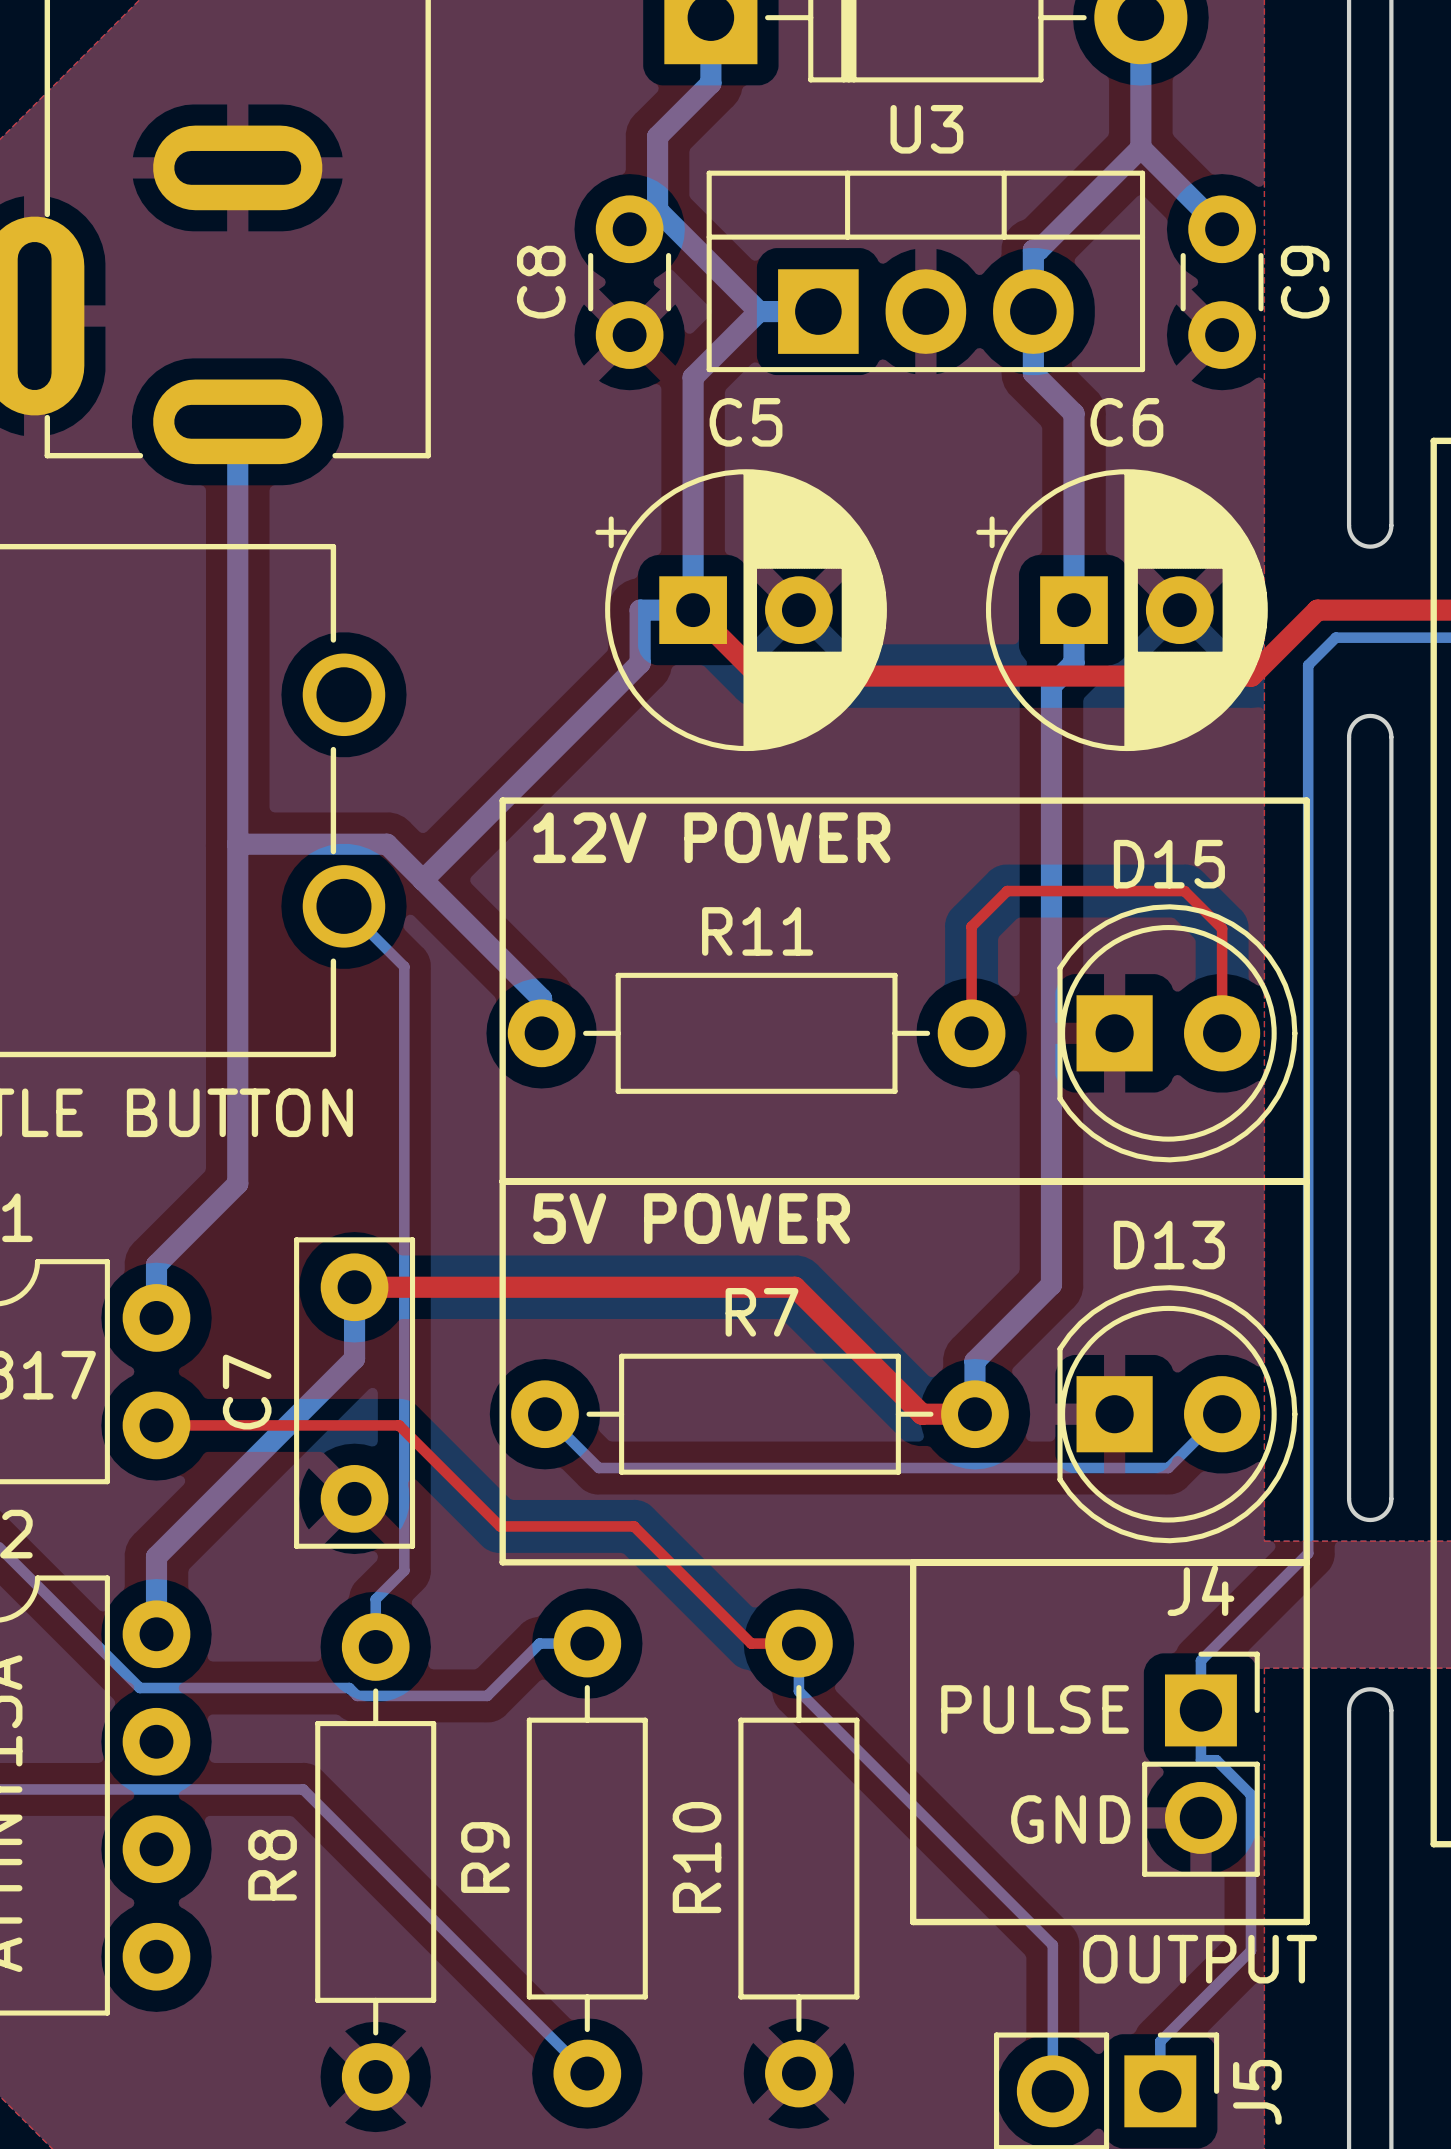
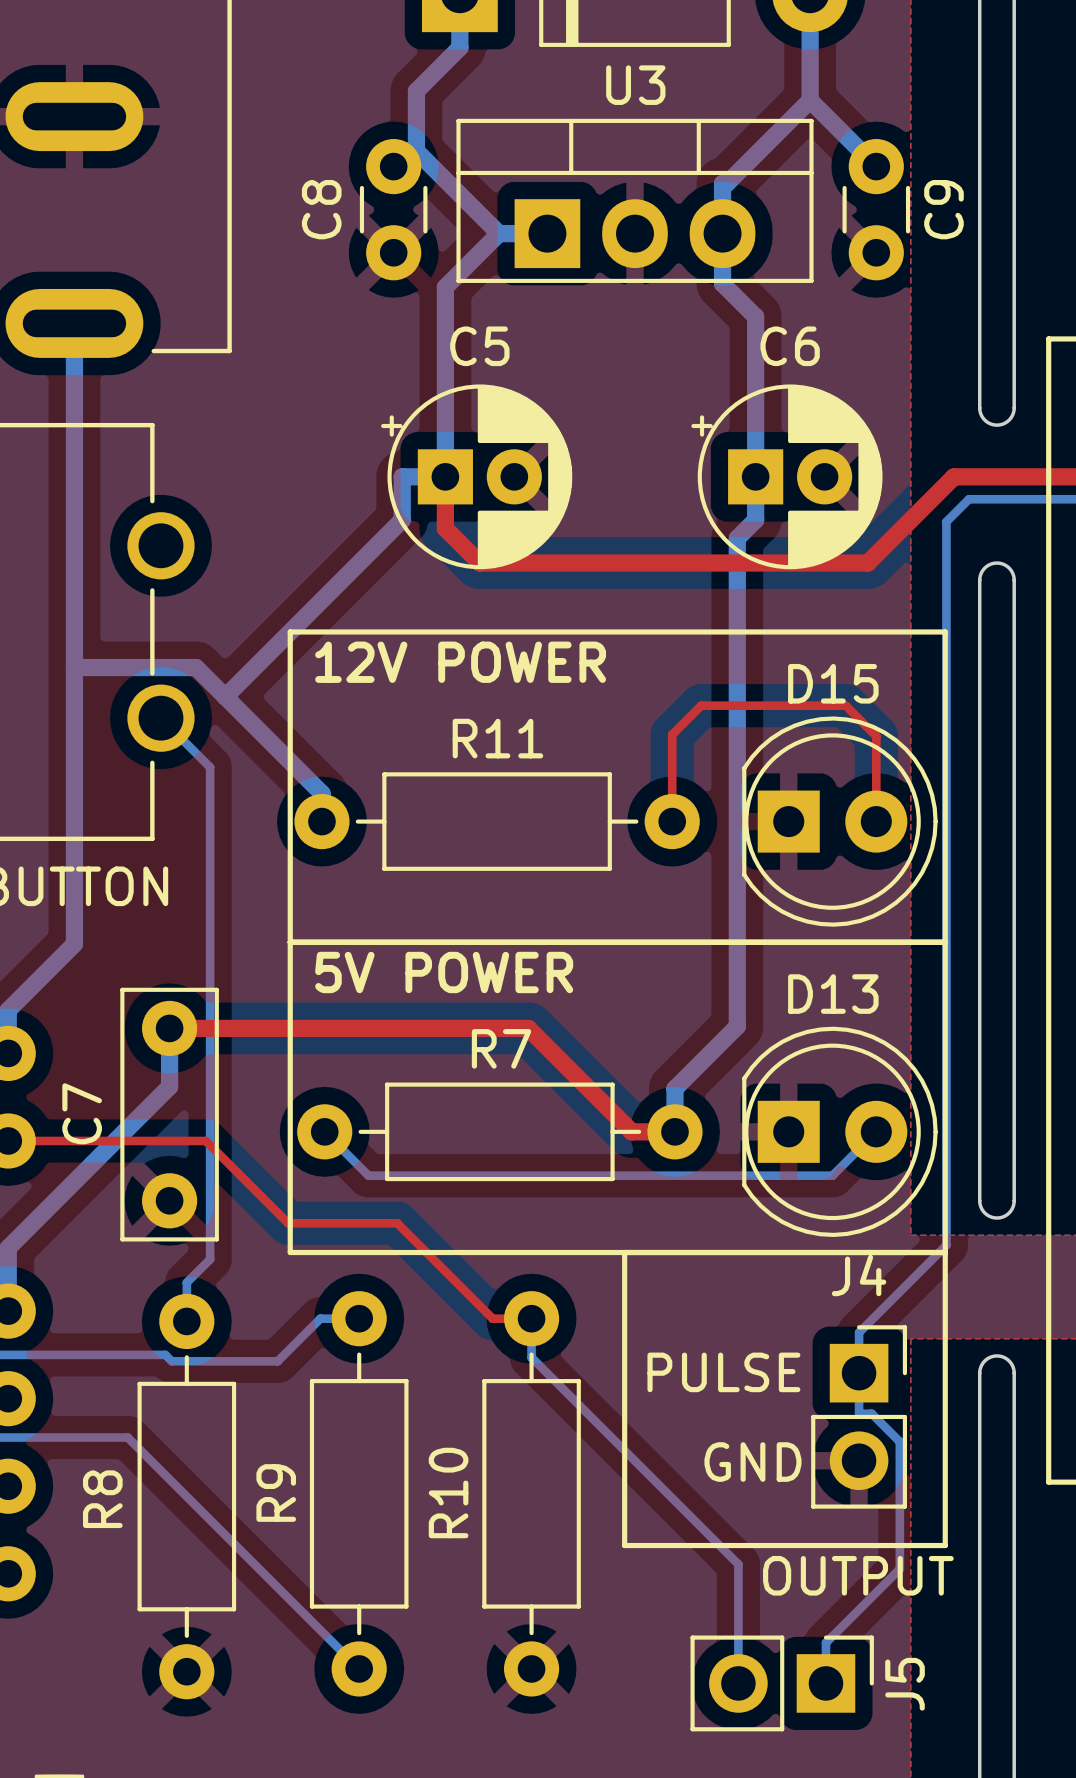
C5 footprint: [595, 469, 887, 752] -> [381, 384, 573, 570]
C6 footprint: [976, 469, 1268, 752] -> [691, 384, 883, 570]
top track: (693, 610) (759, 676) (1251, 676) -> (445, 476) (445, 528) (479, 563) (867, 563) (900, 530)

